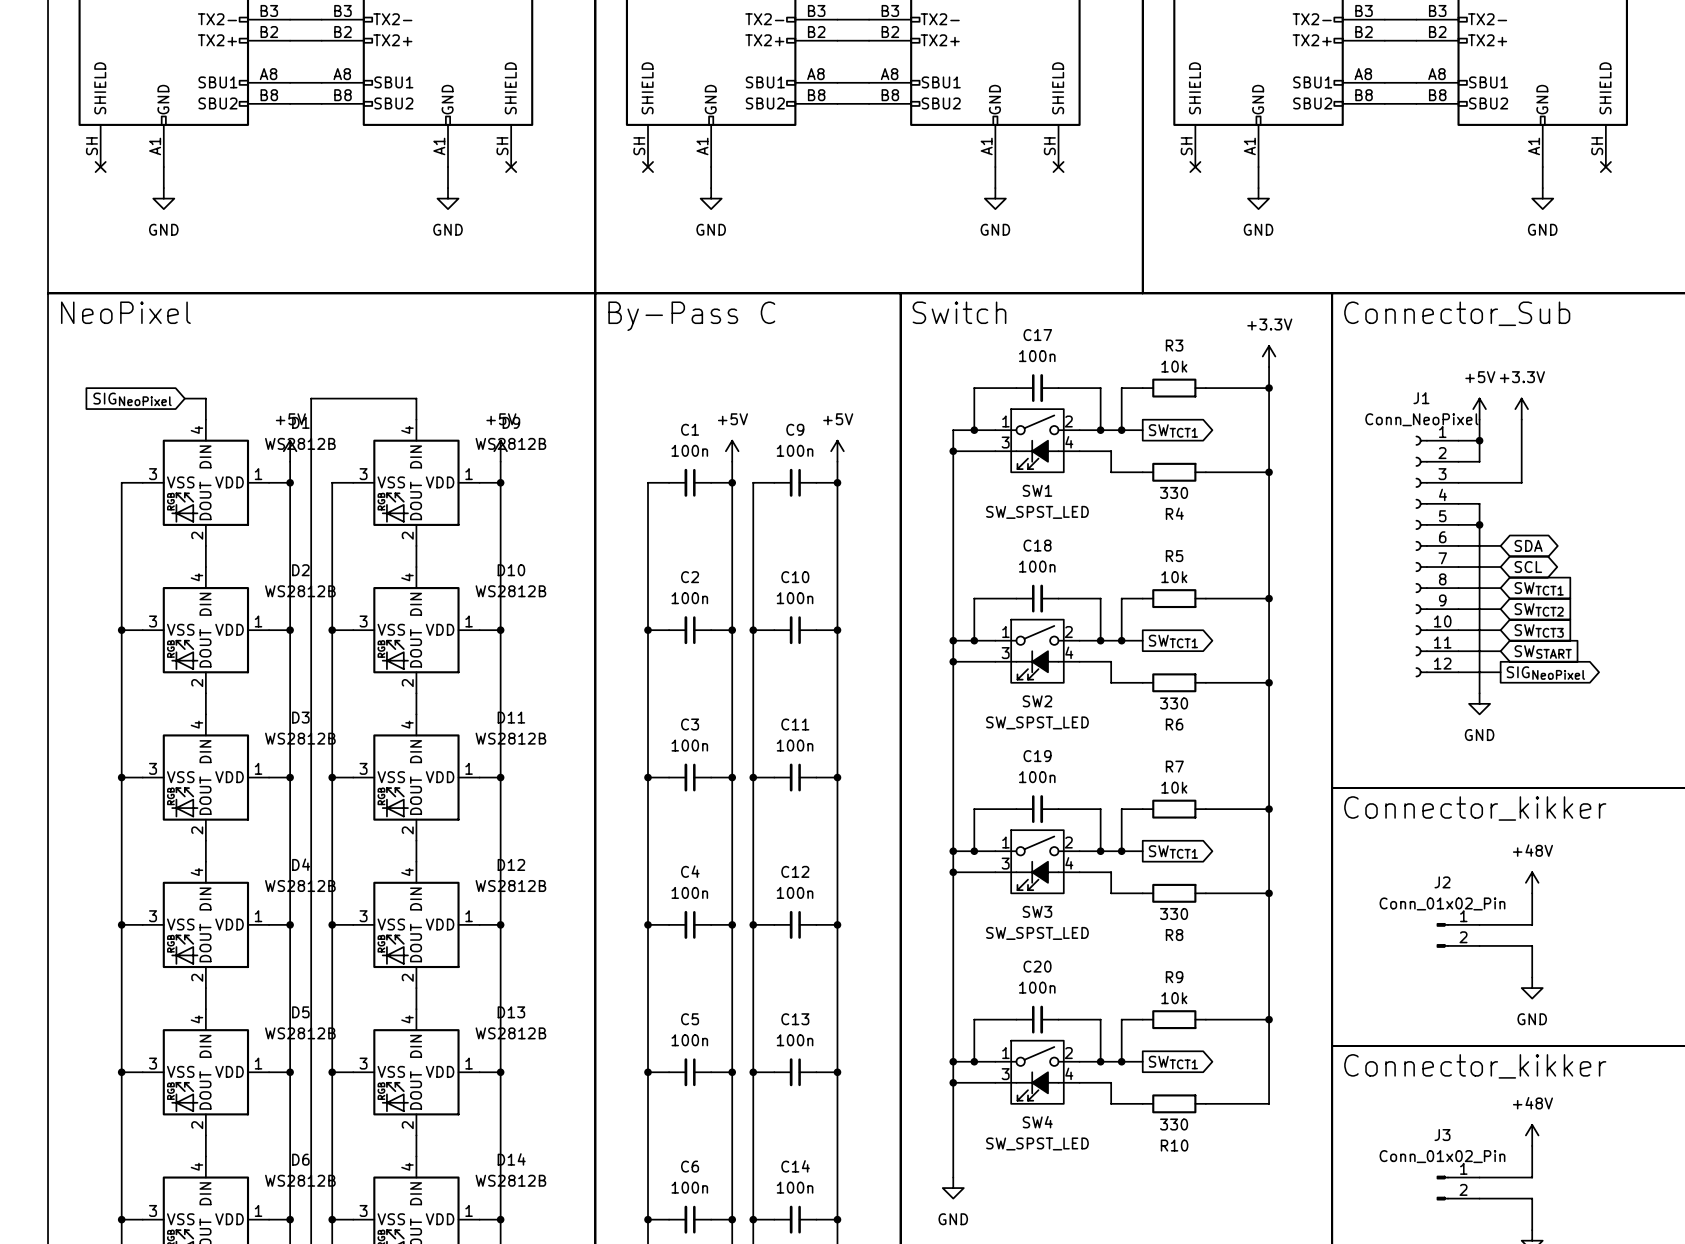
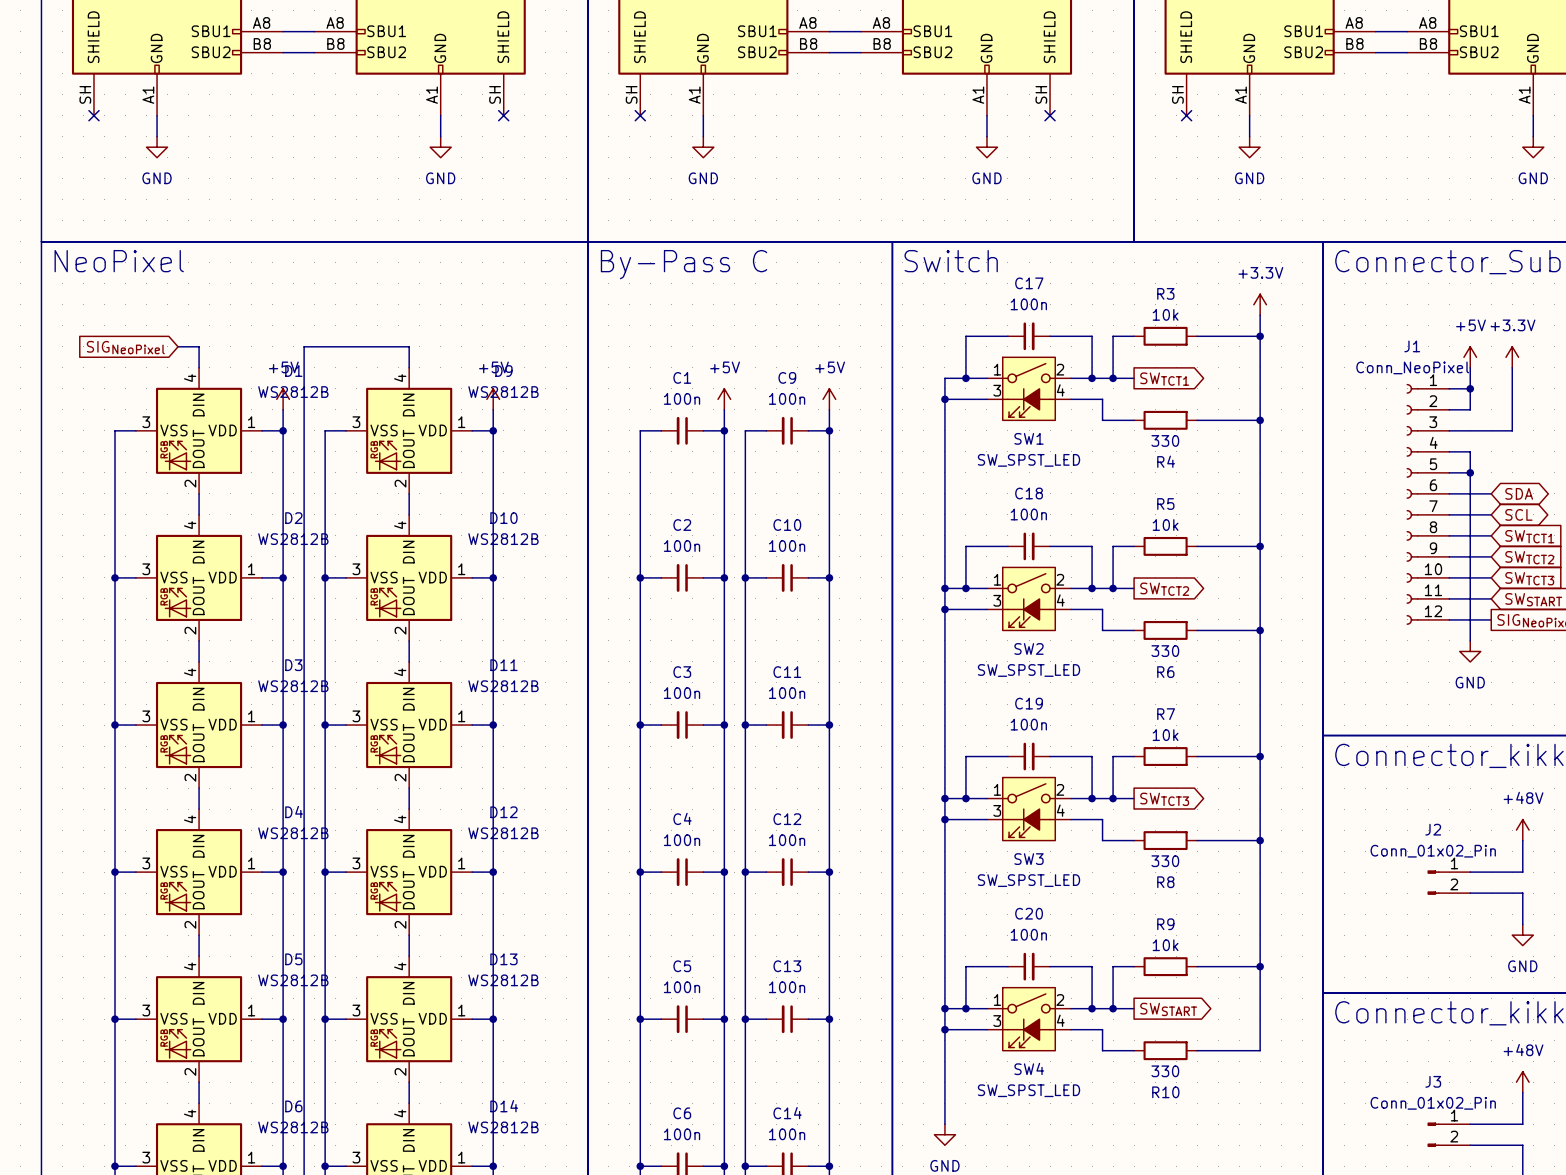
global label: SWTCT1 (1173, 641) -> SWTCT2 (1164, 589)
global label: SWTCT1 (1173, 852) -> SWTCT3 (1164, 799)
global label: SWTCT1 (1173, 1062) -> SWSTART (1168, 1009)

